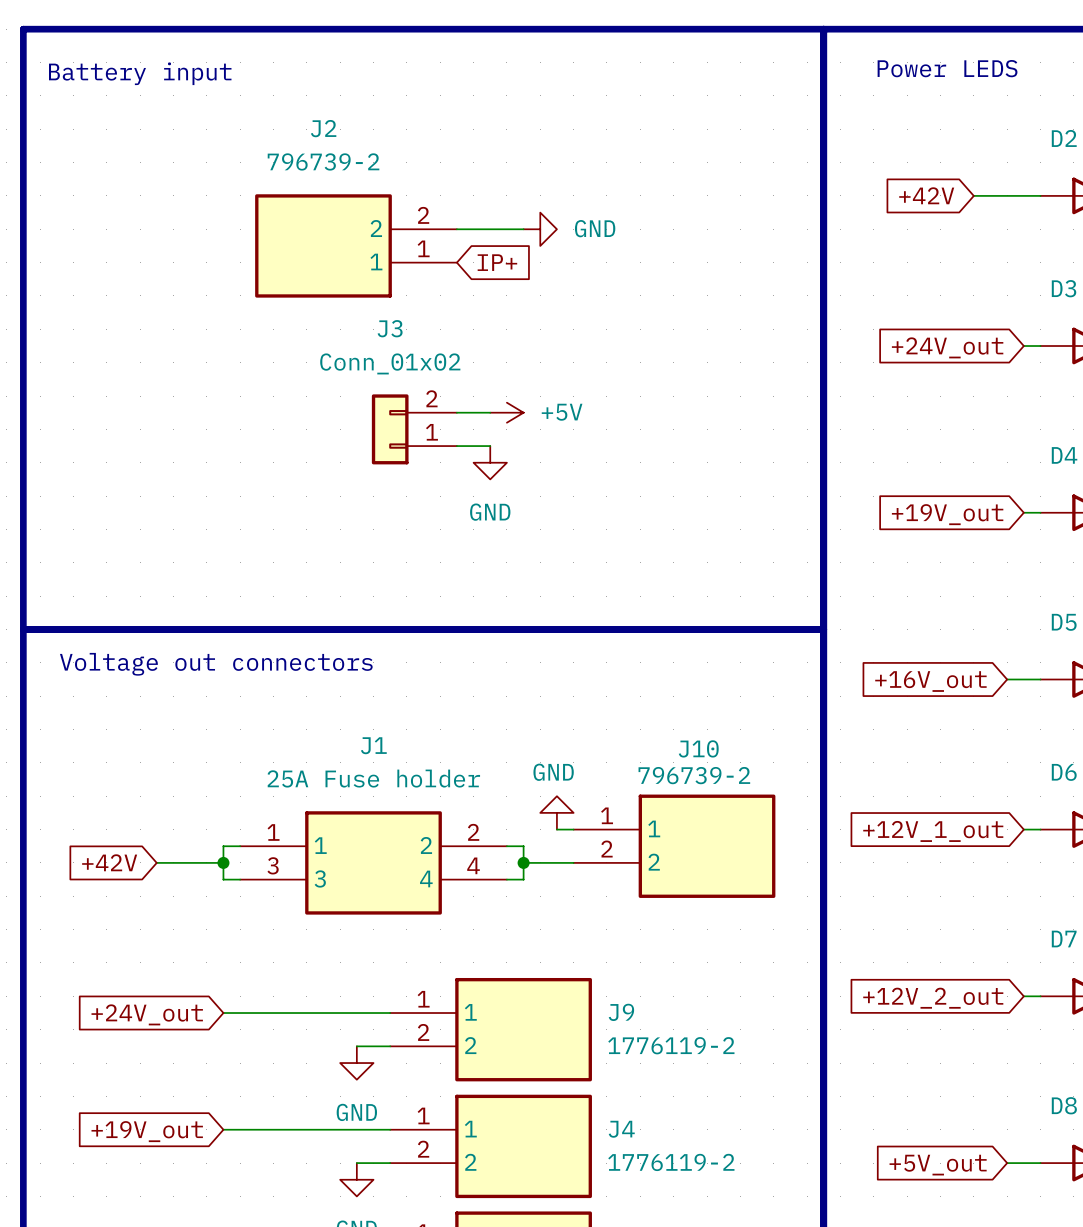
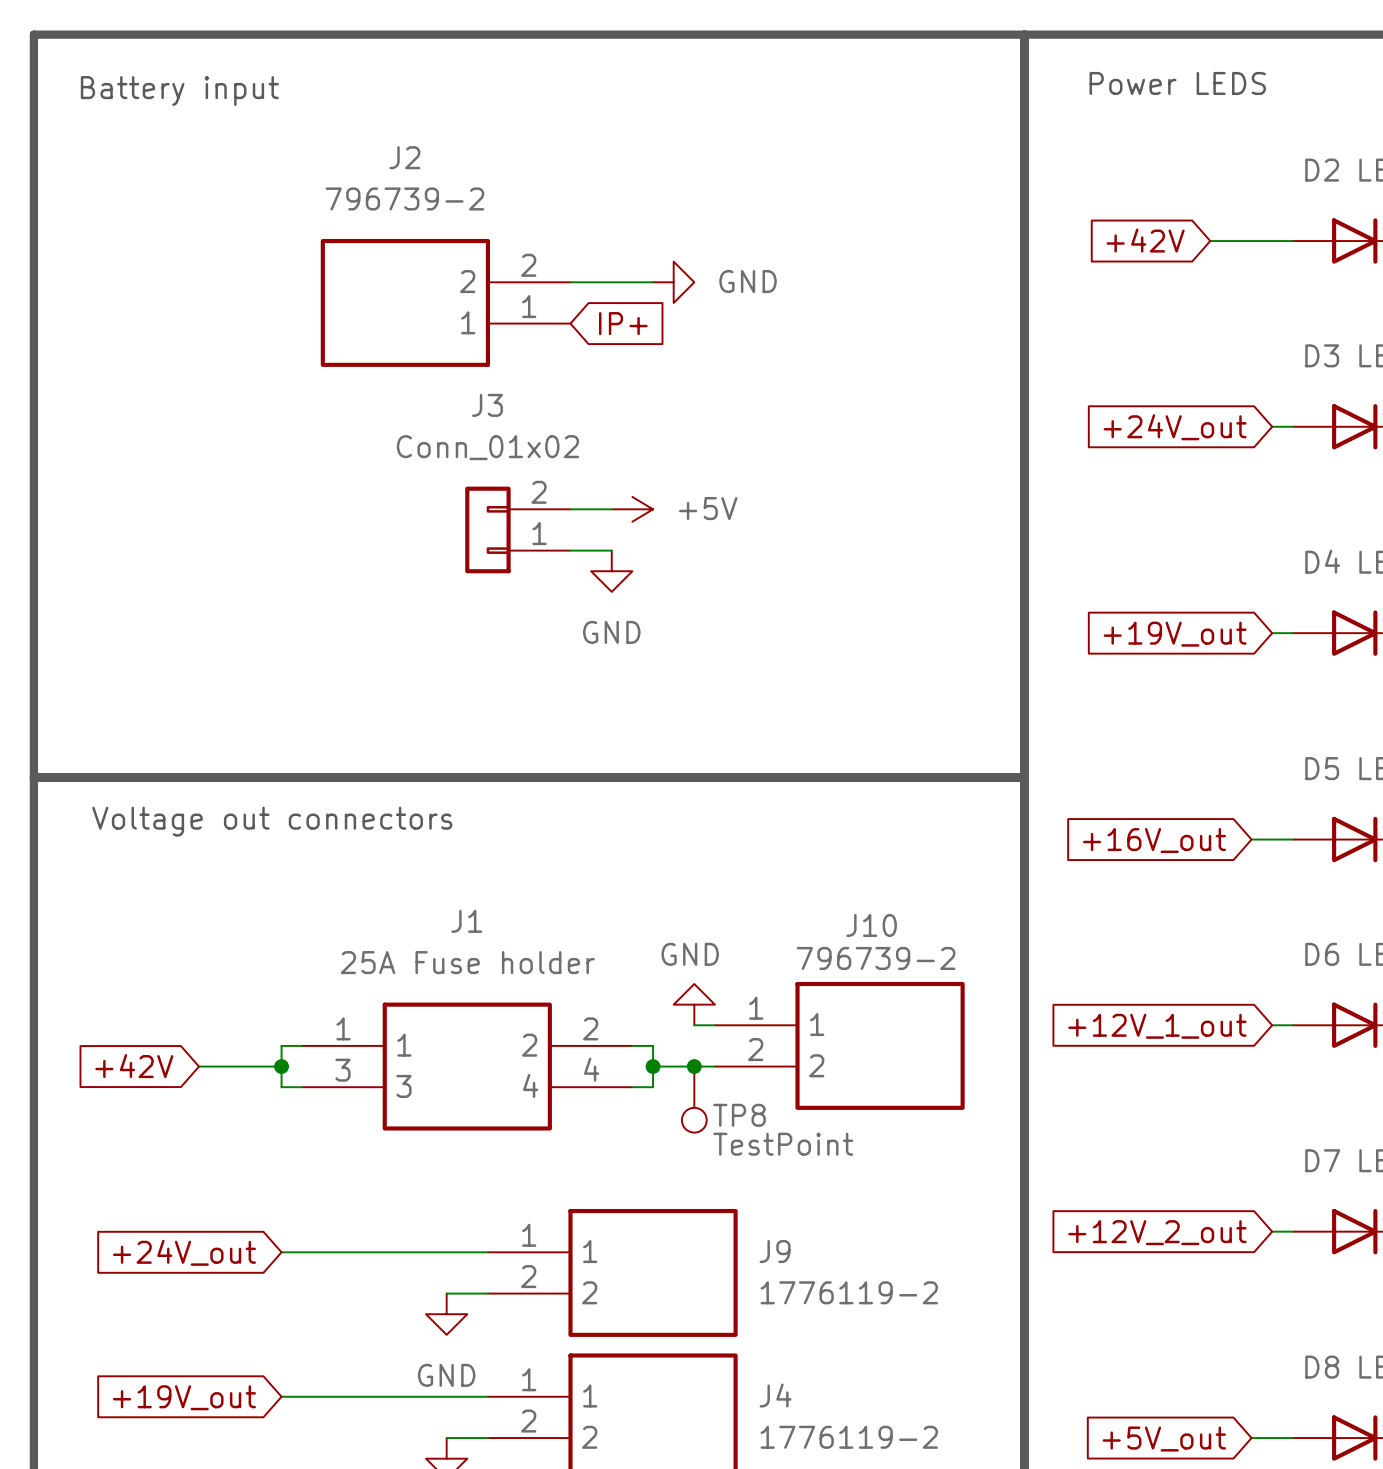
junction: none -> (694, 1066)
TP8: none -> TestPoint (694, 1099)

